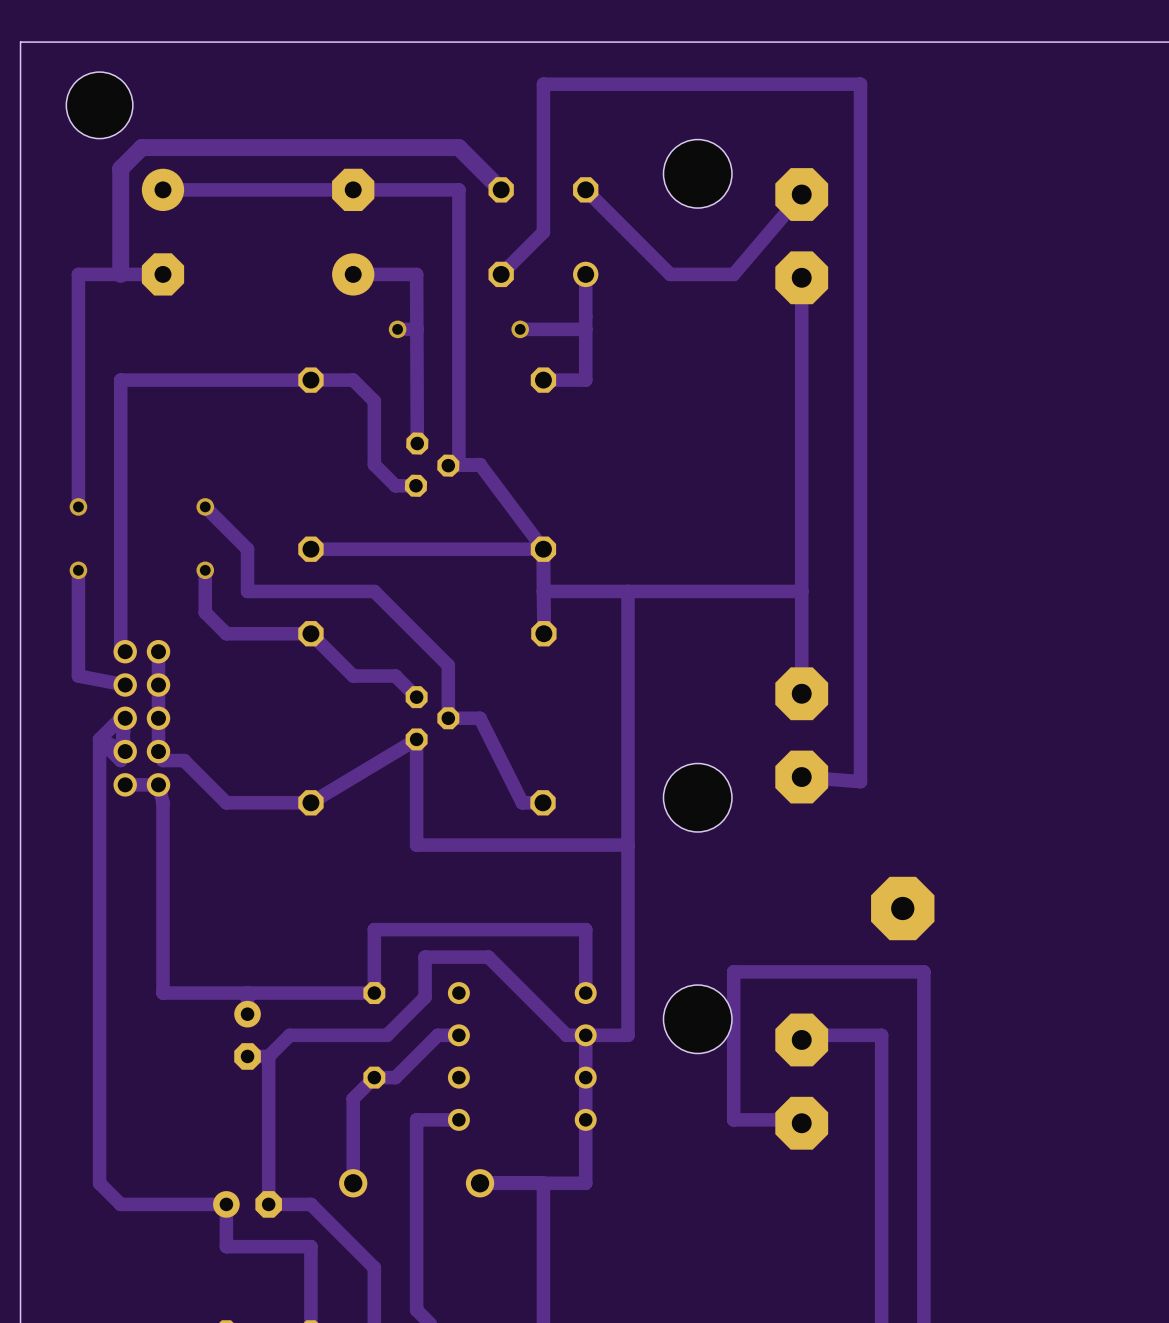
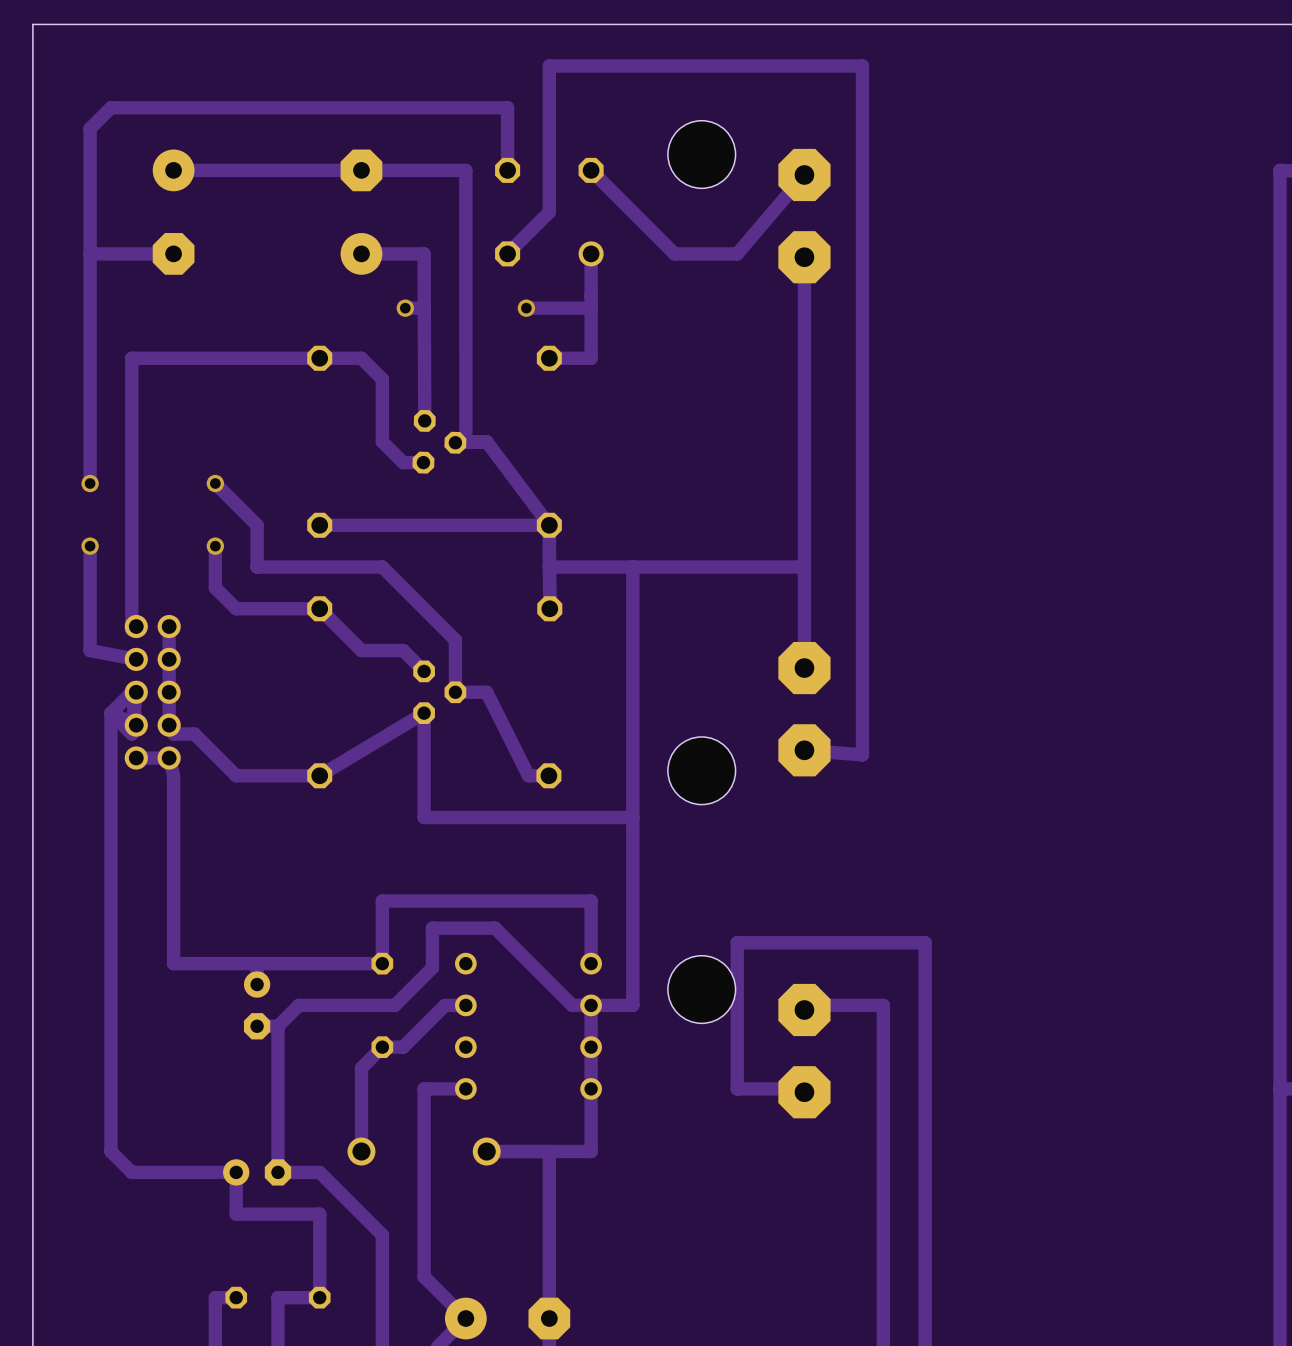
hole: (99, 105) -> none
track: (501, 189) (458, 147) (141, 147) (120, 168) (120, 274) -> (507, 170) (507, 107) (110, 107) (90, 128) (90, 253)
part: (902, 908) -> none

